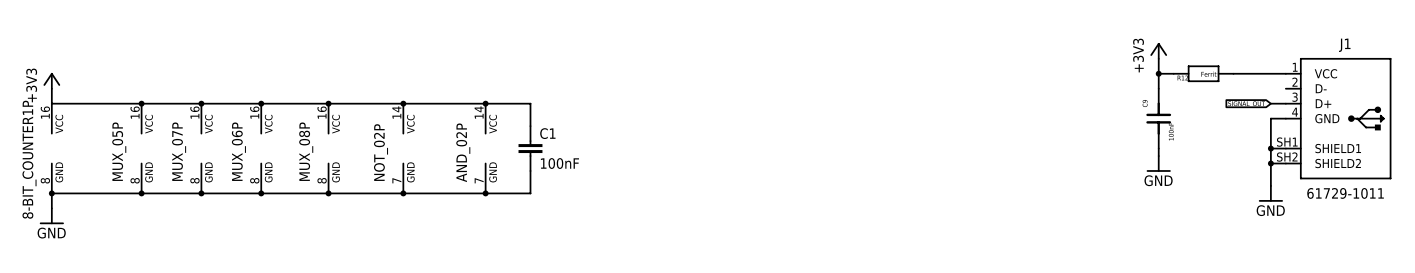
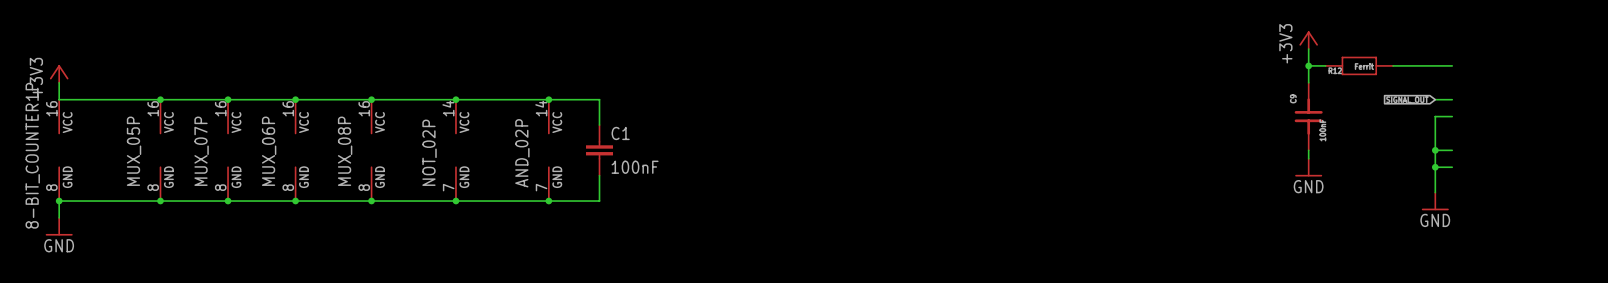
J1: 61729-1011 (1338, 118) -> none

